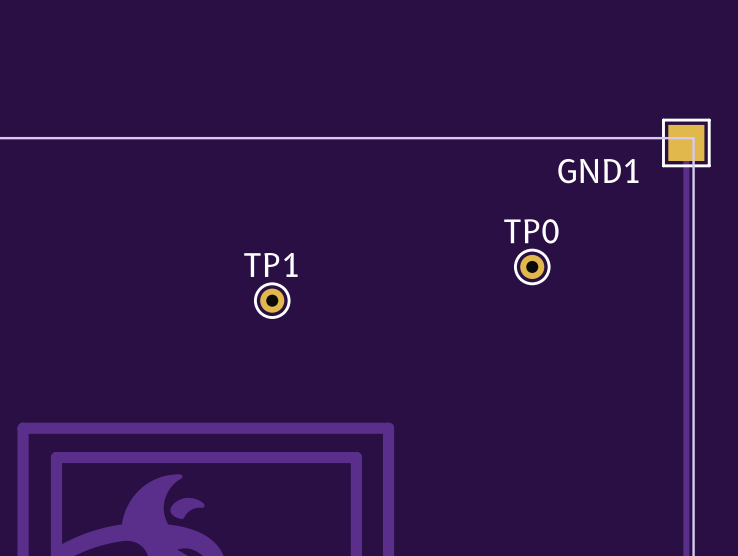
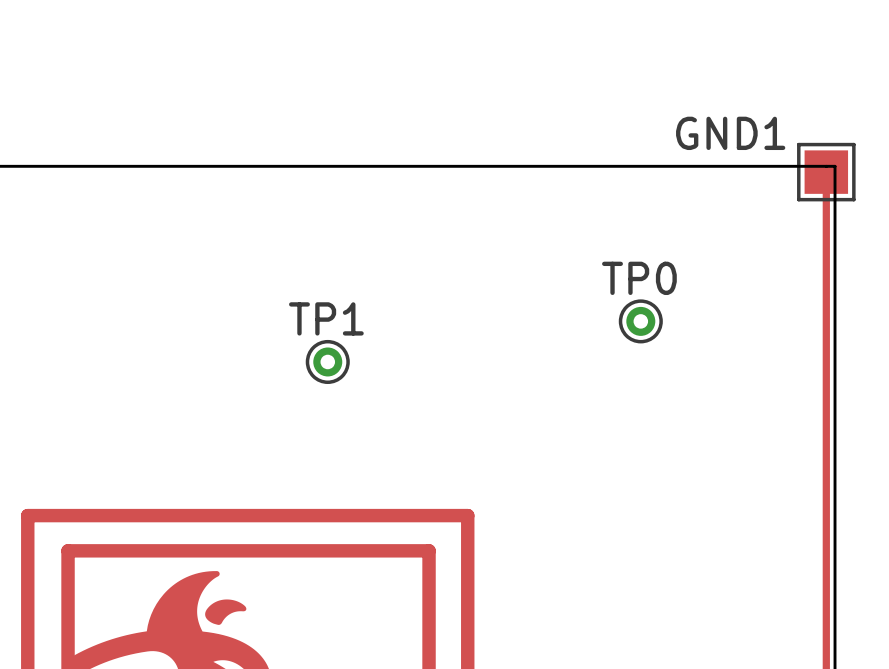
GND1 name position: GND1 (598, 171) -> GND1 (730, 133)

